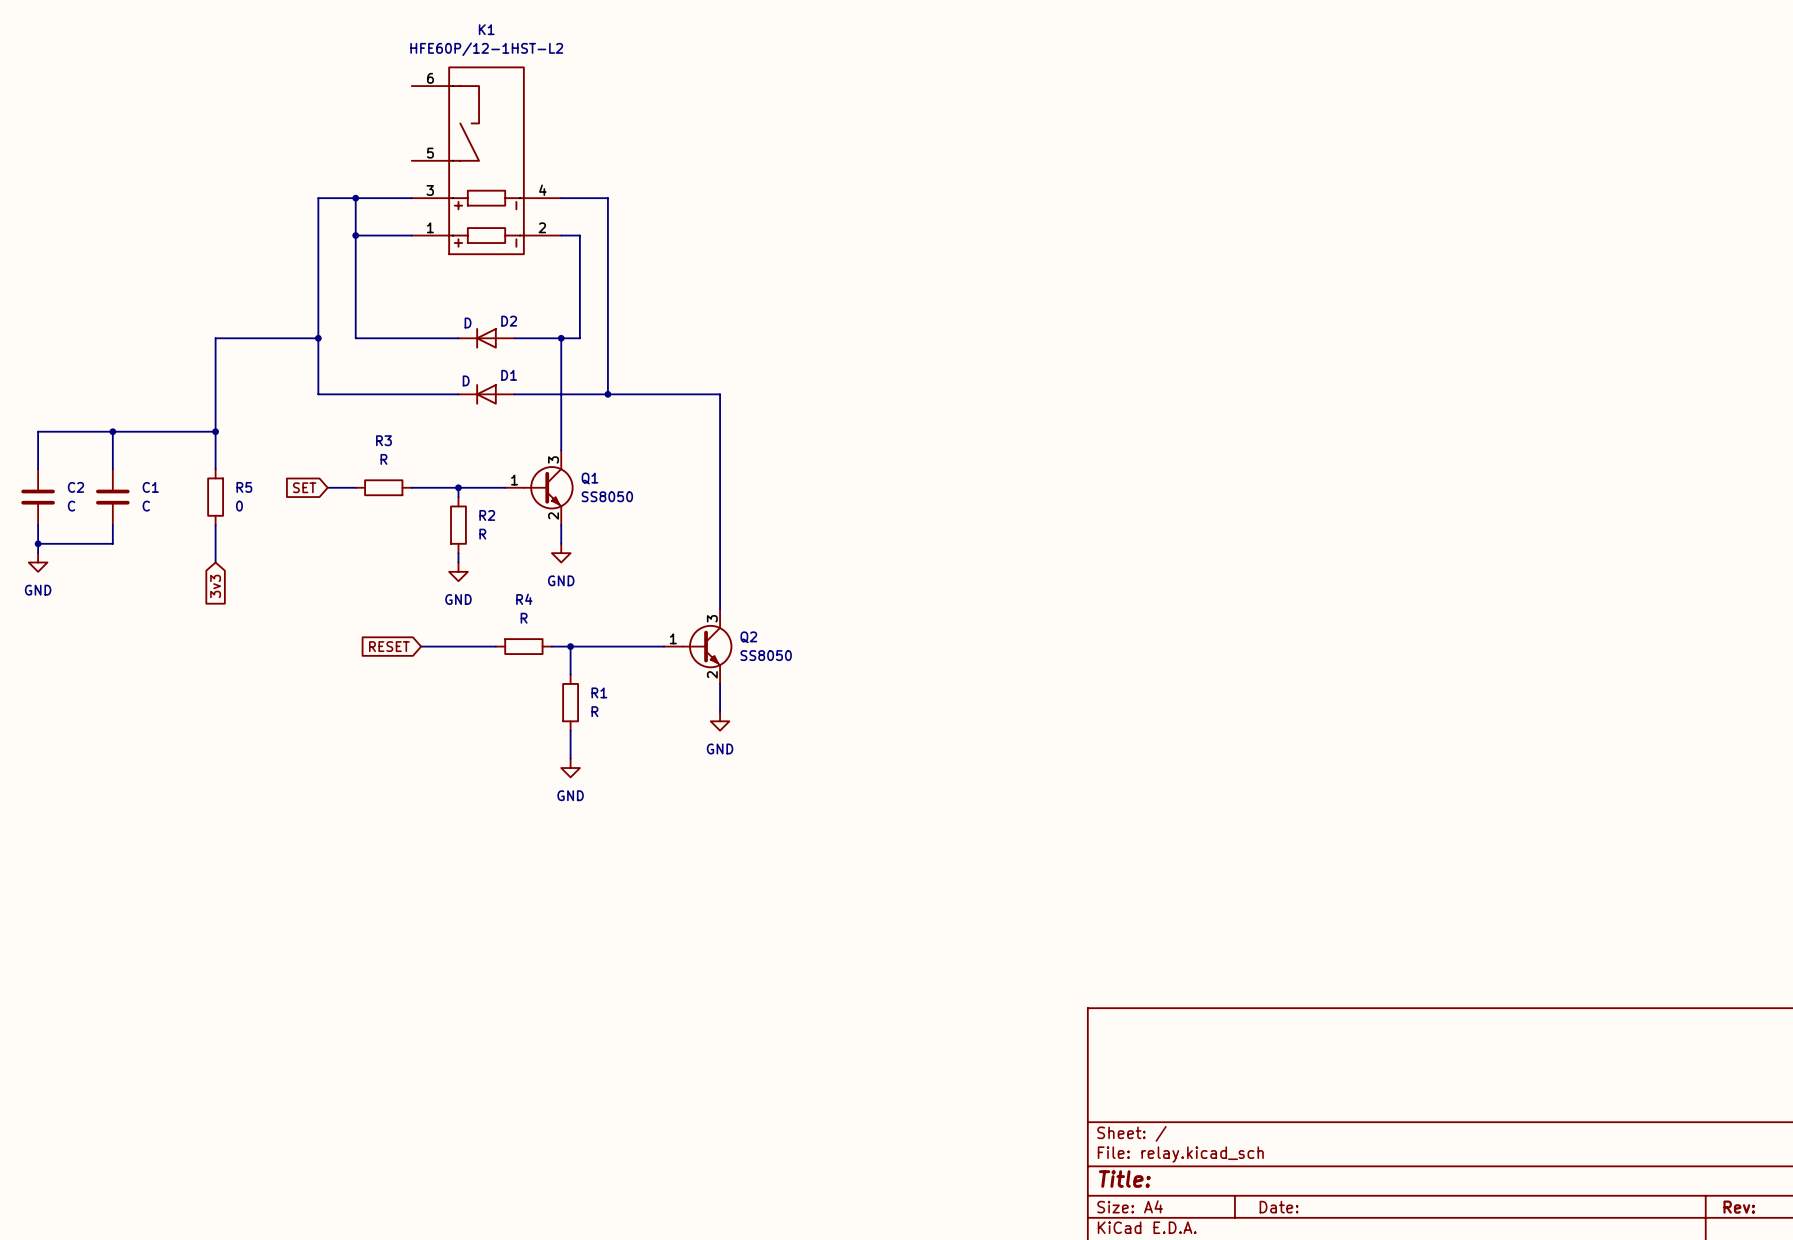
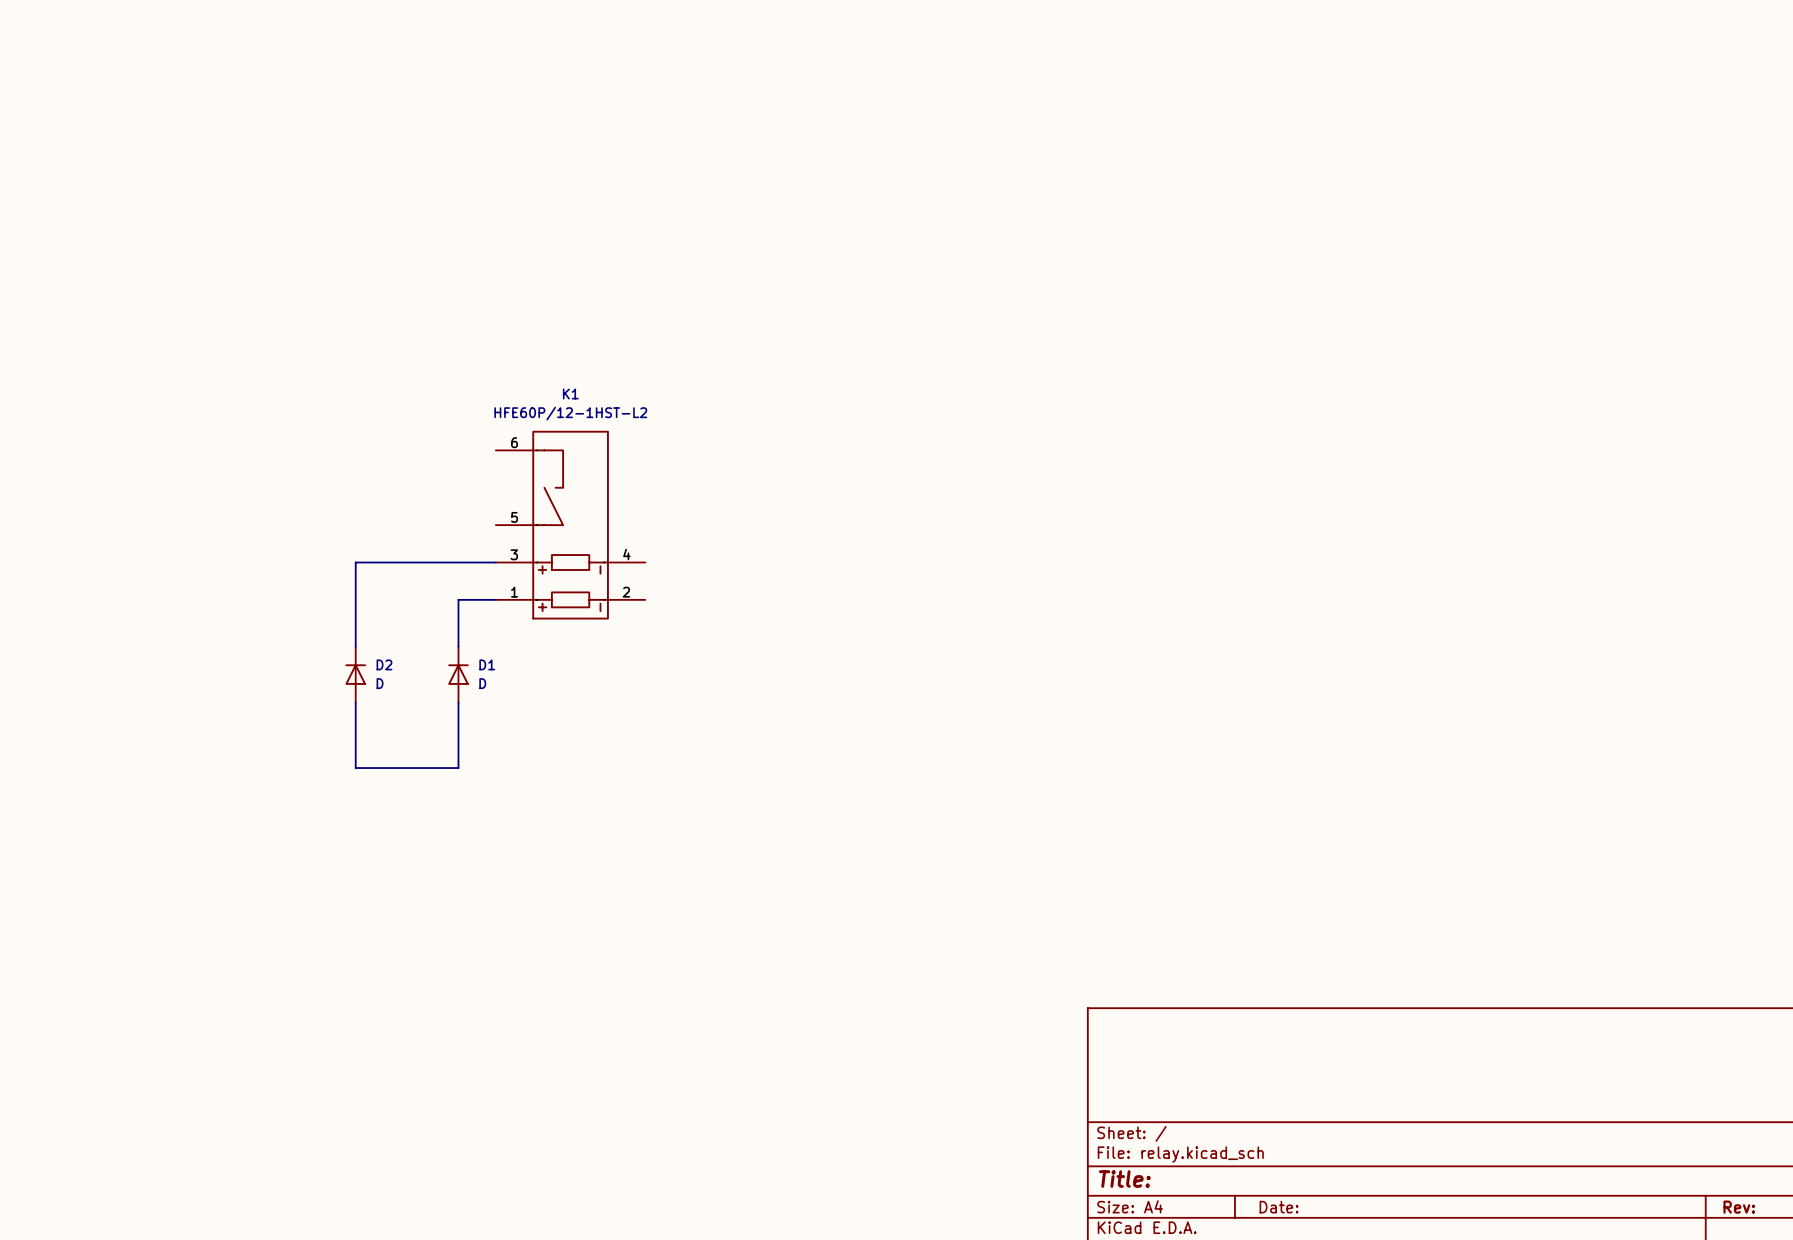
K1 position: (486, 160) -> (570, 525)
wire: (355, 198) (355, 338) (458, 338) -> none
junction: (355, 198) -> none
wire: (411, 198) (318, 198) (318, 394) (458, 394) -> none
wire: (561, 198) (607, 198) (607, 394) -> none
wire: (355, 235) (411, 235) -> none
junction: (355, 235) -> none
wire: (561, 235) (579, 235) (579, 338) (514, 338) -> none
D2 value position: D (468, 323) -> D (380, 683)
wire: (318, 338) (215, 338) (215, 469) -> none
junction: (318, 338) -> none
D2 rotation: 0° (486, 338) -> 90° clockwise (355, 674)
D2 position: (486, 338) -> (355, 674)
wire: (561, 338) (561, 450) -> none
junction: (561, 338) -> none
D1 value position: D (466, 380) -> D (482, 683)
D1 rotation: 0° (486, 394) -> 90° clockwise (458, 674)
D1 position: (486, 394) -> (458, 674)
wire: (514, 394) (720, 394) (720, 609) -> none
junction: (607, 394) -> none
wire: (112, 431) (112, 469) -> none
junction: (112, 431) -> none
wire: (215, 431) (38, 431) (38, 469) -> none
junction: (215, 431) -> none
global label: SET (304, 487) -> none
wire: (327, 487) (355, 487) -> none
R3: R (383, 487) -> none
wire: (411, 487) (505, 487) -> none
wire: (458, 487) (458, 497) -> none
junction: (458, 487) -> none
Q1: SS8050 (539, 487) -> none
C2: C (38, 497) -> none
C1: C (112, 497) -> none
R5: 0 (215, 497) -> none
wire: (38, 525) (38, 553) -> none
wire: (112, 525) (112, 543) (38, 543) -> none
wire: (215, 525) (215, 562) -> none
R2: R (458, 525) -> none
wire: (561, 525) (561, 543) -> none
junction: (38, 543) -> none
wire: (458, 553) (458, 562) -> none
power symbol: GND (561, 553) -> none
power symbol: GND (38, 562) -> none
wire: none -> (495, 562) (355, 562) (355, 646)
power symbol: GND (458, 571) -> none
global label: 3v3 (215, 586) -> none
wire: none -> (495, 599) (458, 599) (458, 646)
global label: RESET (389, 646) -> none
wire: (421, 646) (495, 646) -> none
R4: R (523, 646) -> none
wire: (551, 646) (664, 646) -> none
wire: (570, 646) (570, 674) -> none
junction: (570, 646) -> none
Q2: SS8050 (698, 646) -> none
wire: (720, 683) (720, 711) -> none
wire: none -> (355, 702) (355, 768) (458, 768) (458, 702)
R1: R (570, 702) -> none
power symbol: GND (720, 721) -> none
wire: (570, 730) (570, 758) -> none
power symbol: GND (570, 768) -> none

